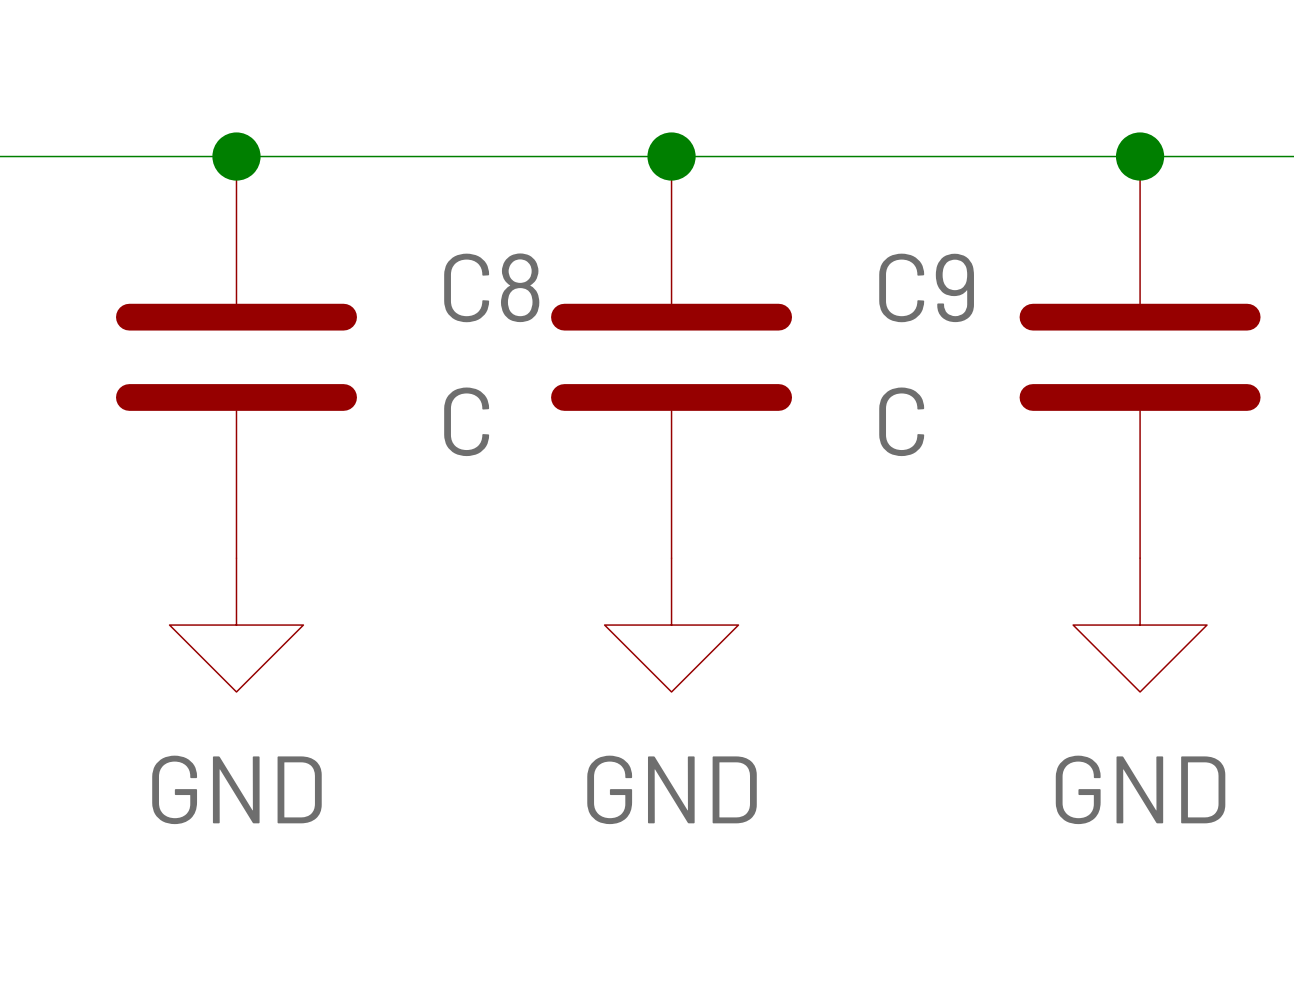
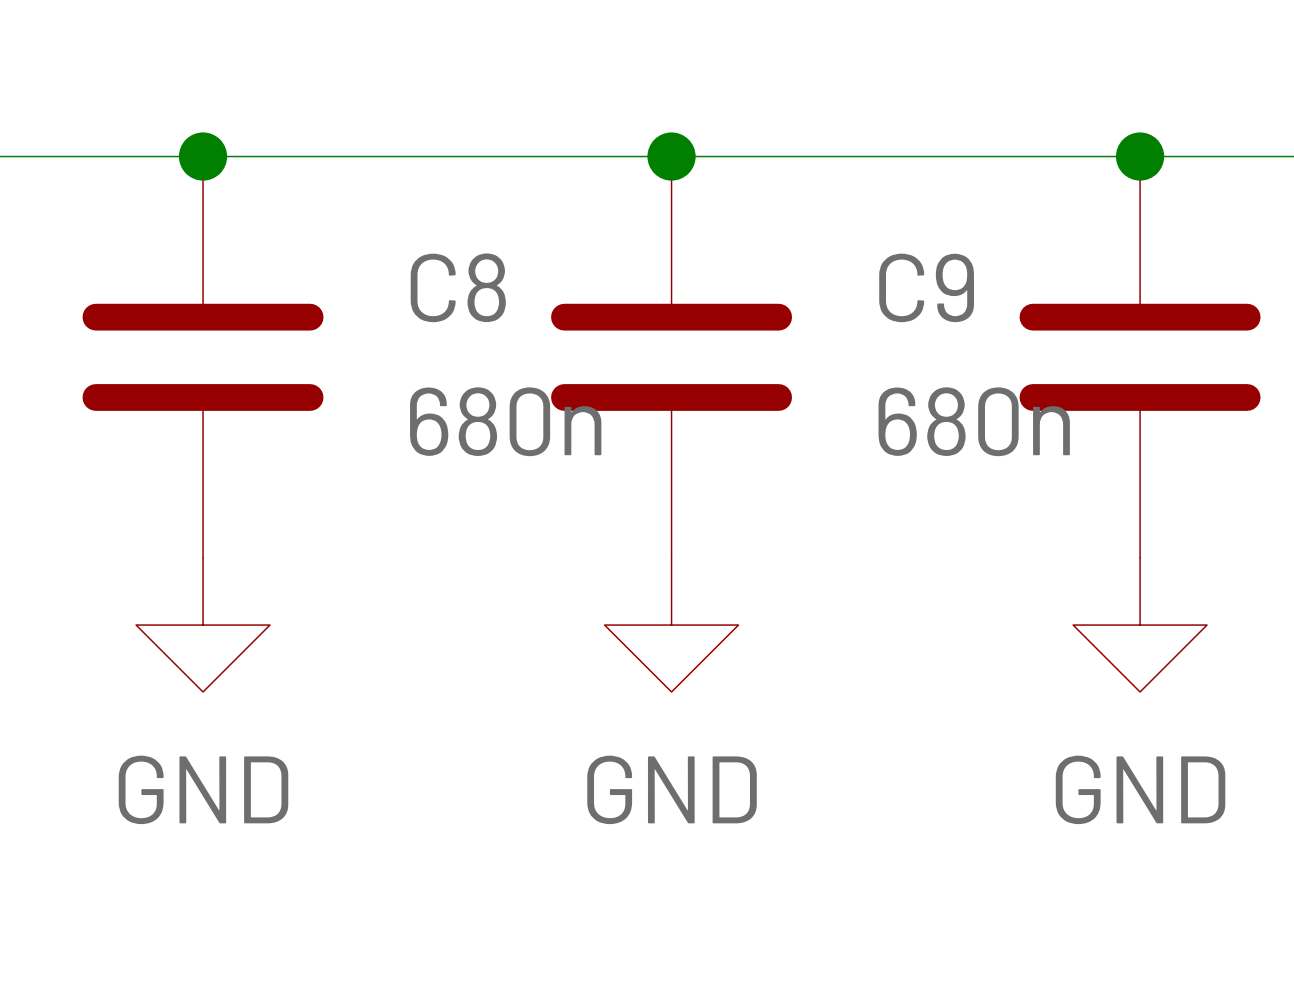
junction position: (236, 156) -> (203, 156)
C8 position: (236, 357) -> (203, 357)
C8 value: C (466, 421) -> 680n (505, 421)
C9 value: C (901, 421) -> 680n (974, 421)
power symbol position: GND (236, 625) -> GND (203, 625)

